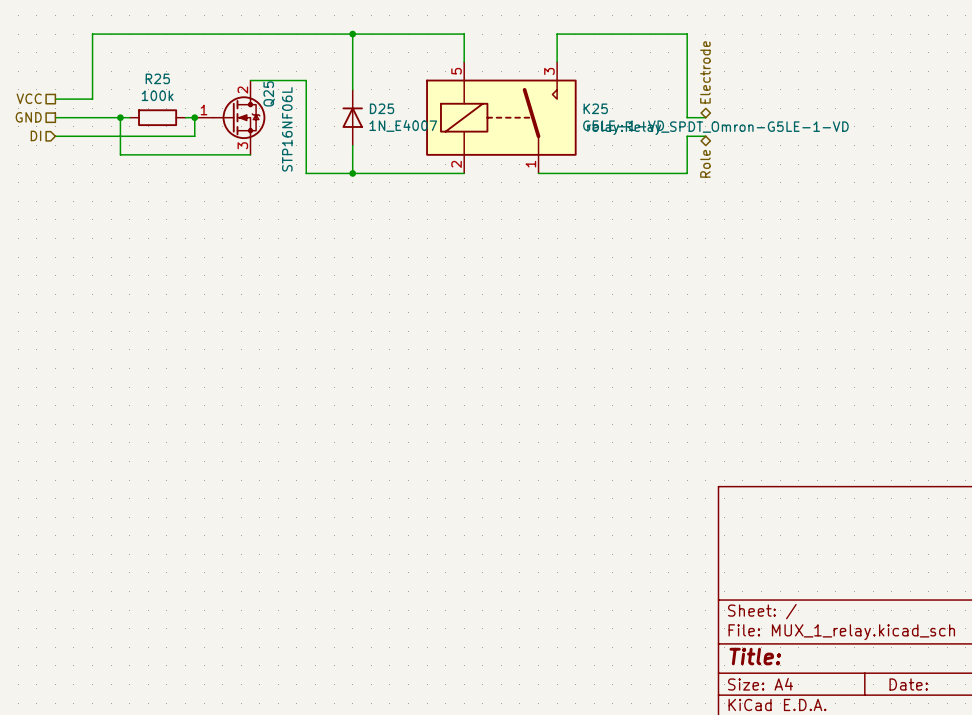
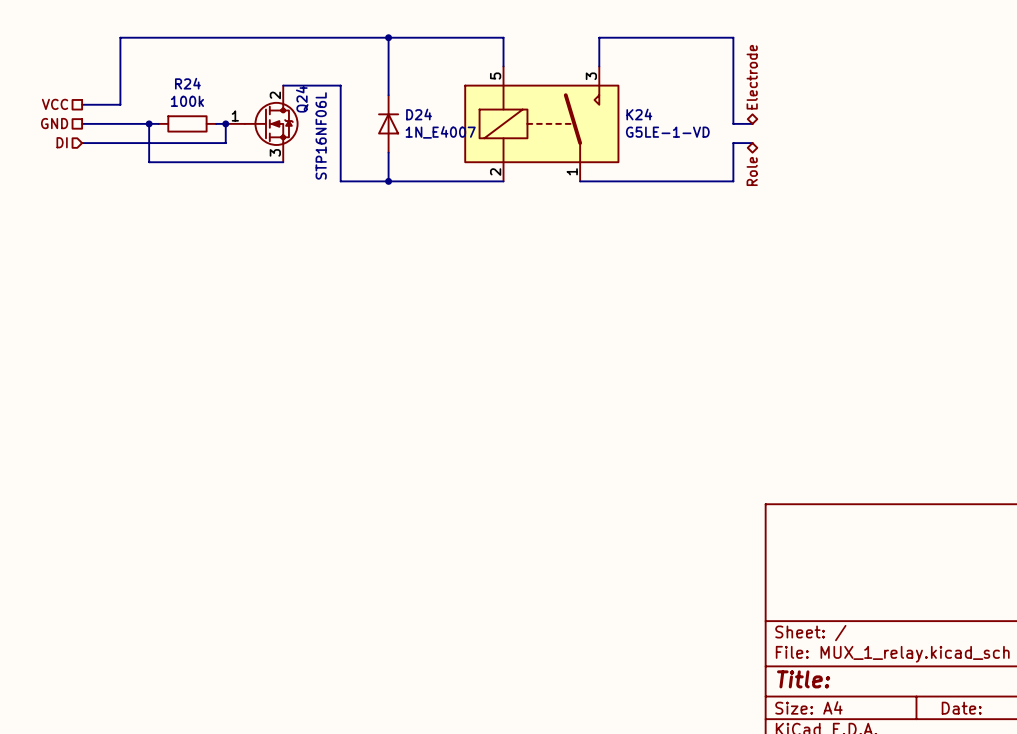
R25 name: R25 (157, 78) -> R24 (187, 83)
Q25 name: Q25 (269, 93) -> Q24 (302, 99)
D25 name: D25 (382, 108) -> D24 (419, 114)
K25 name: K25 (595, 108) -> K24 (639, 114)
K25 text: relay:Relay_SPDT_Omron-G5LE-1-VD (718, 128) -> none

